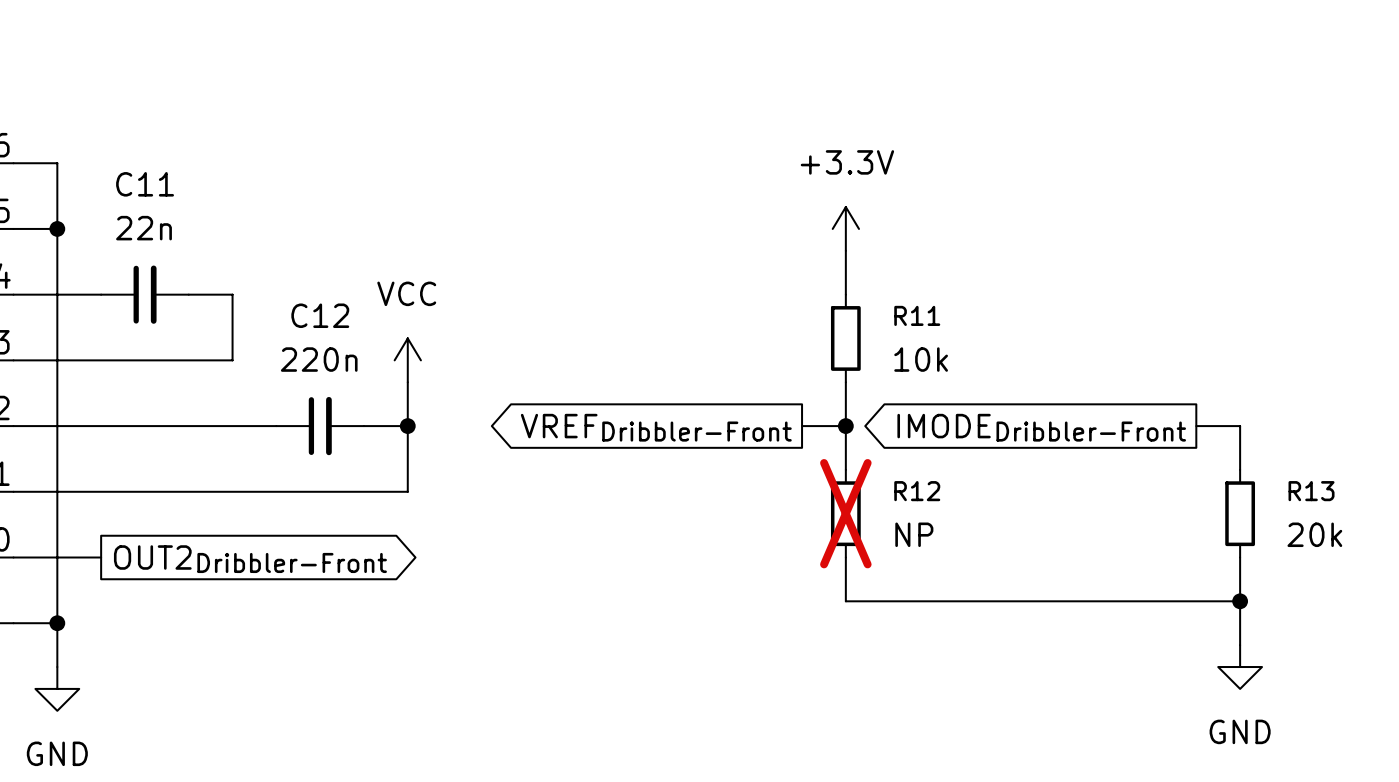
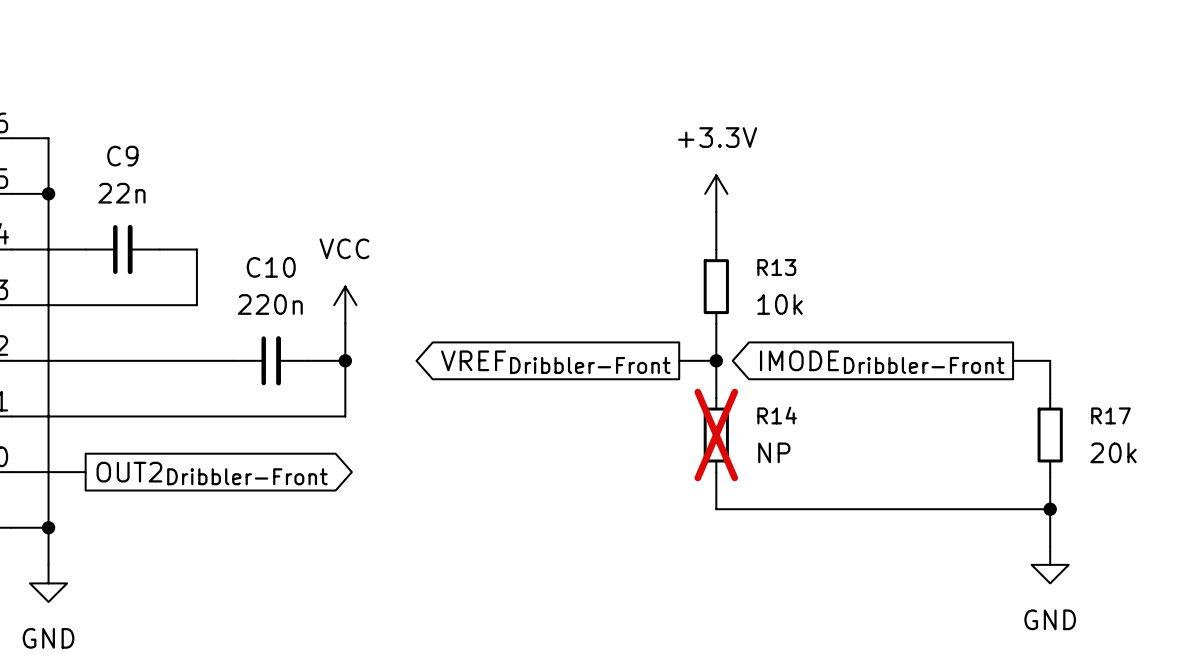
C11 name: C11 (145, 184) -> C9 (122, 156)
C12 name: C12 (320, 315) -> C10 (271, 267)
R11 name: R11 (917, 315) -> R13 (776, 267)
R12 name: R12 (917, 491) -> R14 (777, 415)
R13 name: R13 (1311, 491) -> R17 (1111, 415)

